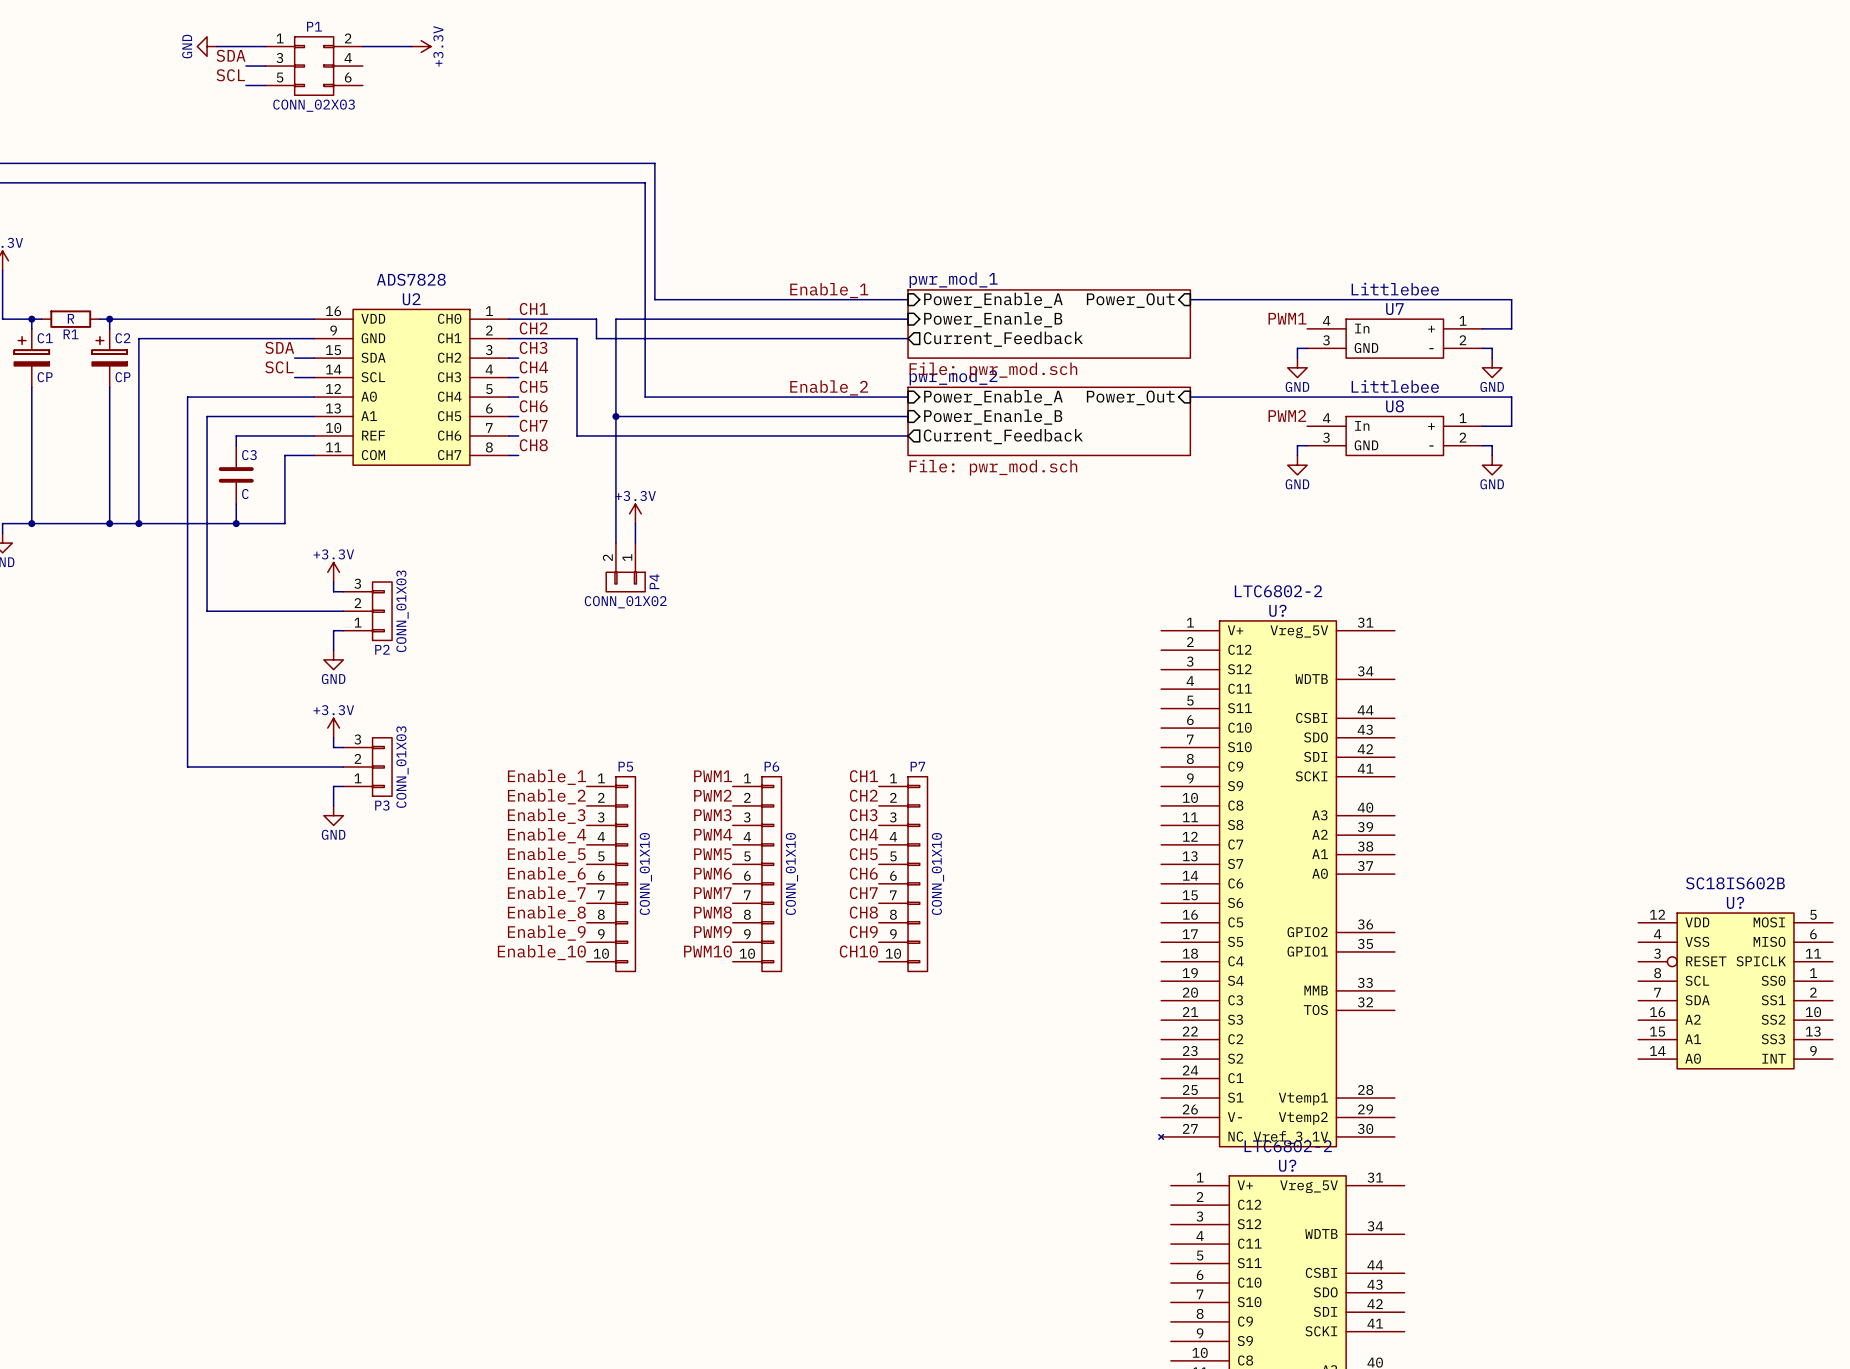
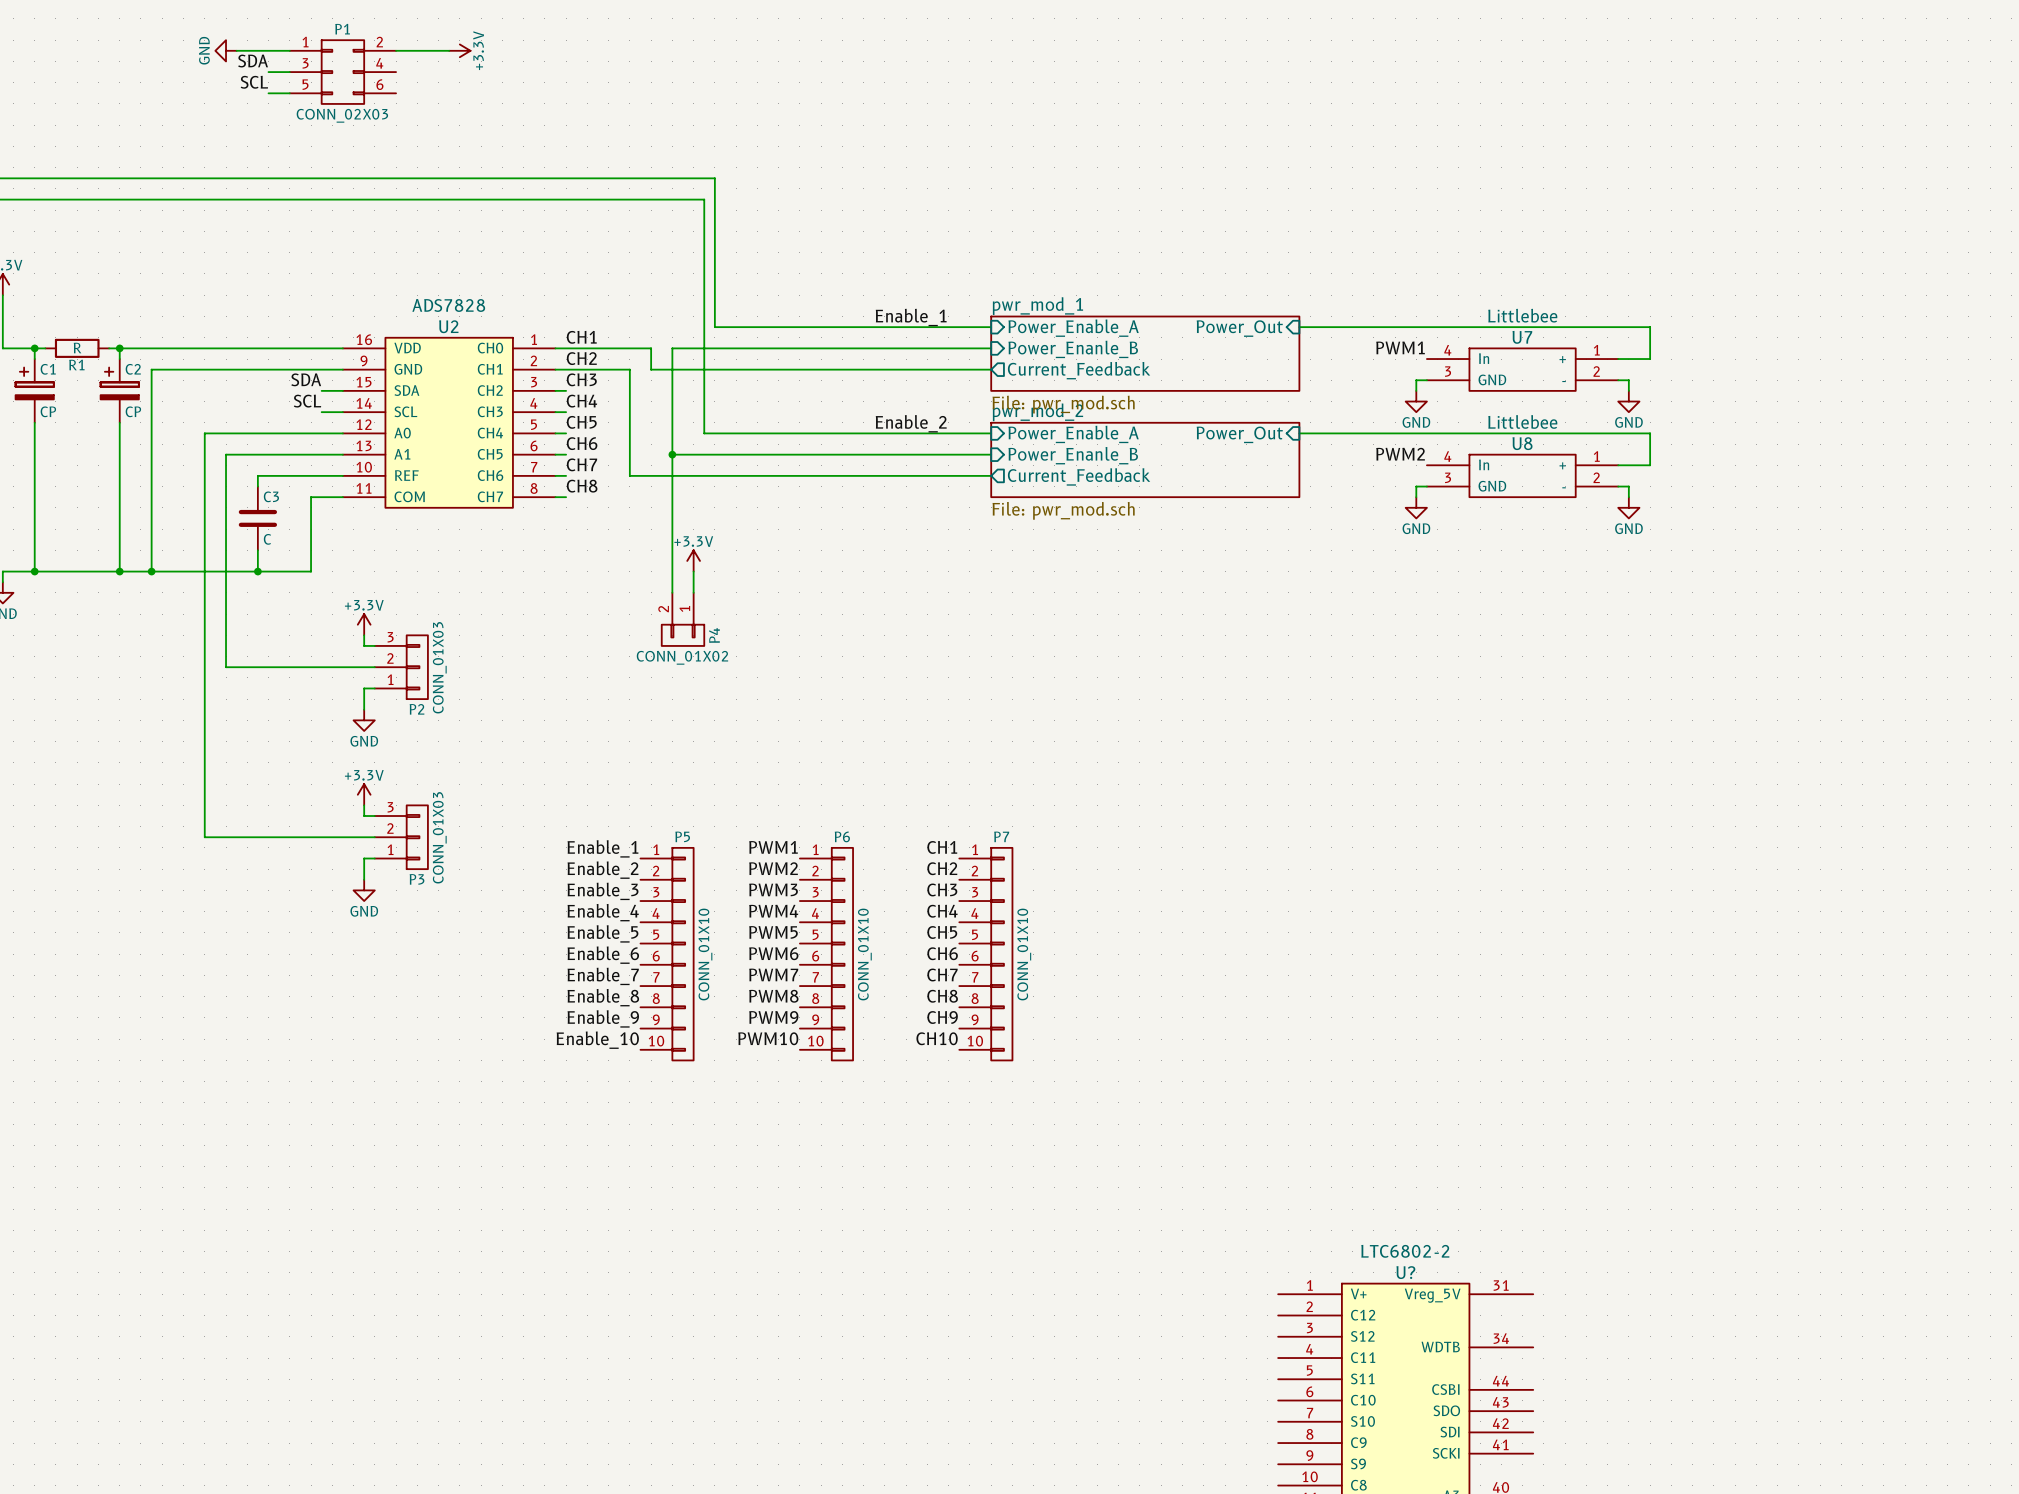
U?: LTC6802-2 (1276, 883) -> none
U?: SC18IS602B (1735, 990) -> none

